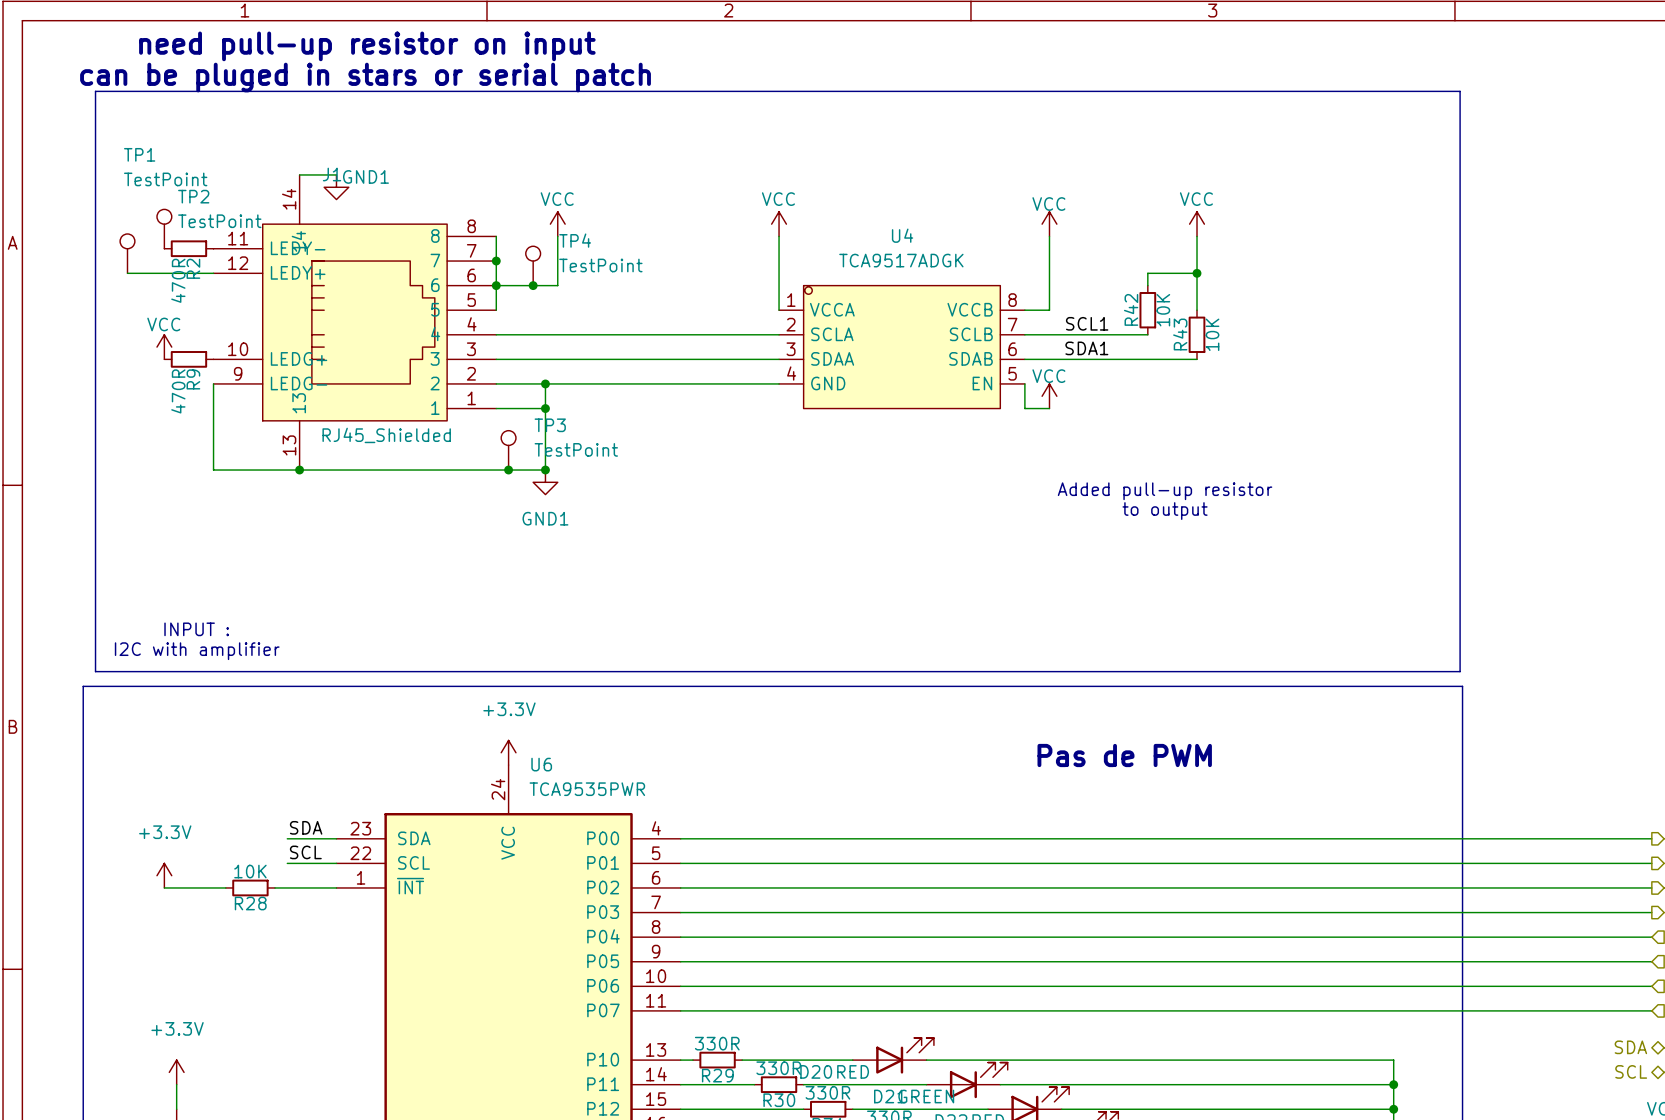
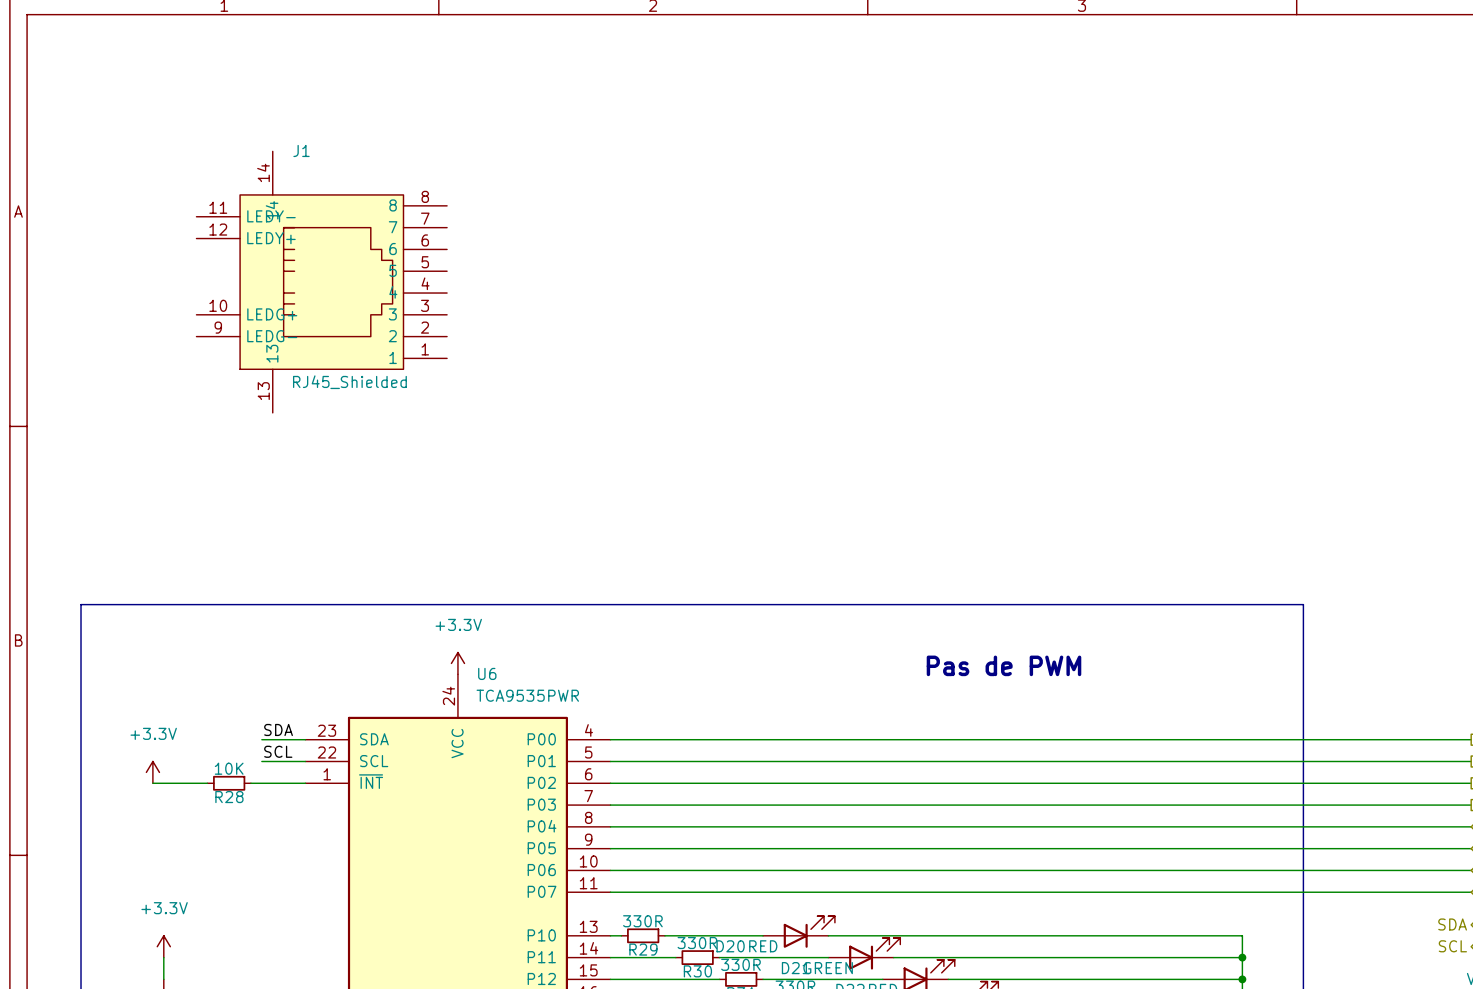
text: need pull-up resistor on input (367, 46) -> none
text: can be pluged in stars or serial patch (365, 77) -> none
line: (95, 91) (1460, 91) (1460, 671) (95, 671) (95, 91) -> none
wire: (299, 174) (336, 174) -> none
power symbol: GND1 (336, 187) -> none
power symbol: VCC (557, 224) -> none
power symbol: VCC (779, 224) -> none
power symbol: VCC (1049, 224) -> none
power symbol: VCC (1197, 224) -> none
TP2: TestPoint (164, 229) -> none
wire: (496, 236) (496, 310) -> none
wire: (557, 236) (557, 285) (496, 285) -> none
wire: (779, 236) (779, 310) -> none
wire: (1049, 236) (1049, 310) (1024, 310) -> none
wire: (1197, 236) (1197, 310) -> none
R2: 470R (188, 248) -> none
TP1: TestPoint (127, 253) -> none
junction: (496, 261) -> none
TP4: TestPoint (533, 265) -> none
wire: (127, 273) (213, 273) -> none
wire: (1197, 273) (1147, 273) (1147, 285) -> none
junction: (1197, 273) -> none
junction: (496, 285) -> none
junction: (533, 285) -> none
R42: 10K (1147, 310) -> none
label: SCL1 (1087, 323) -> none
wire: (496, 334) (779, 334) -> none
wire: (1024, 334) (1147, 334) -> none
R43: 10K (1197, 334) -> none
power symbol: VCC (164, 347) -> none
U4: TCA9517ADGK (901, 347) -> none
label: SDA1 (1086, 348) -> none
R9: 470R (188, 359) -> none
wire: (496, 359) (779, 359) -> none
wire: (1024, 359) (1197, 359) -> none
wire: (213, 383) (213, 470) (545, 470) (545, 383) -> none
wire: (496, 383) (779, 383) -> none
junction: (545, 383) -> none
wire: (1024, 383) (1024, 408) (1049, 408) -> none
power symbol: VCC (1049, 396) -> none
wire: (496, 408) (545, 408) -> none
junction: (545, 408) -> none
TP3: TestPoint (508, 450) -> none
junction: (299, 470) -> none
junction: (508, 470) -> none
junction: (545, 470) -> none
power symbol: GND1 (545, 482) -> none
text: Added pull-up resistor (1165, 491) -> none
text: to output (1165, 511) -> none
text: INPUT : (196, 629) -> none
text: I2C with amplifier (197, 651) -> none

